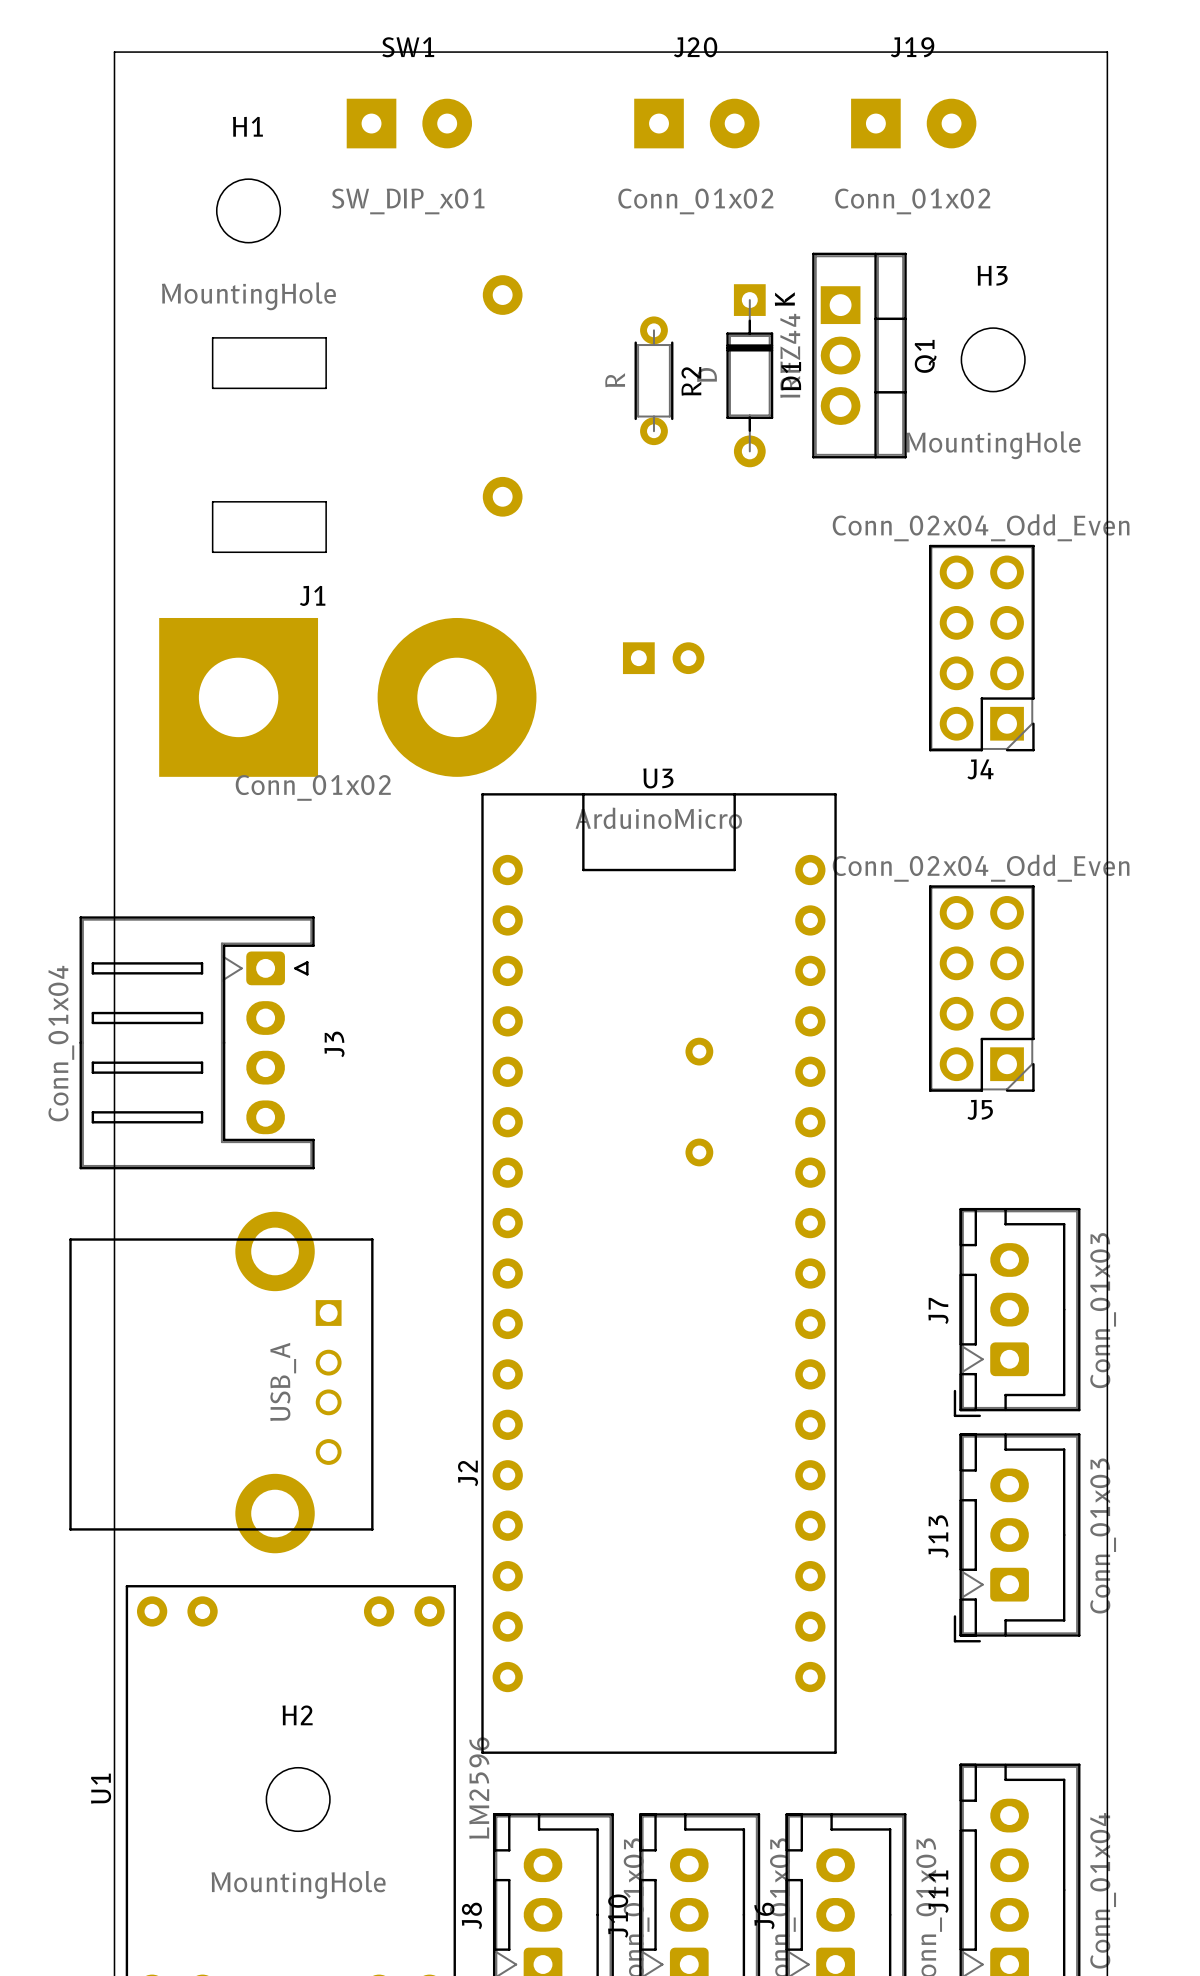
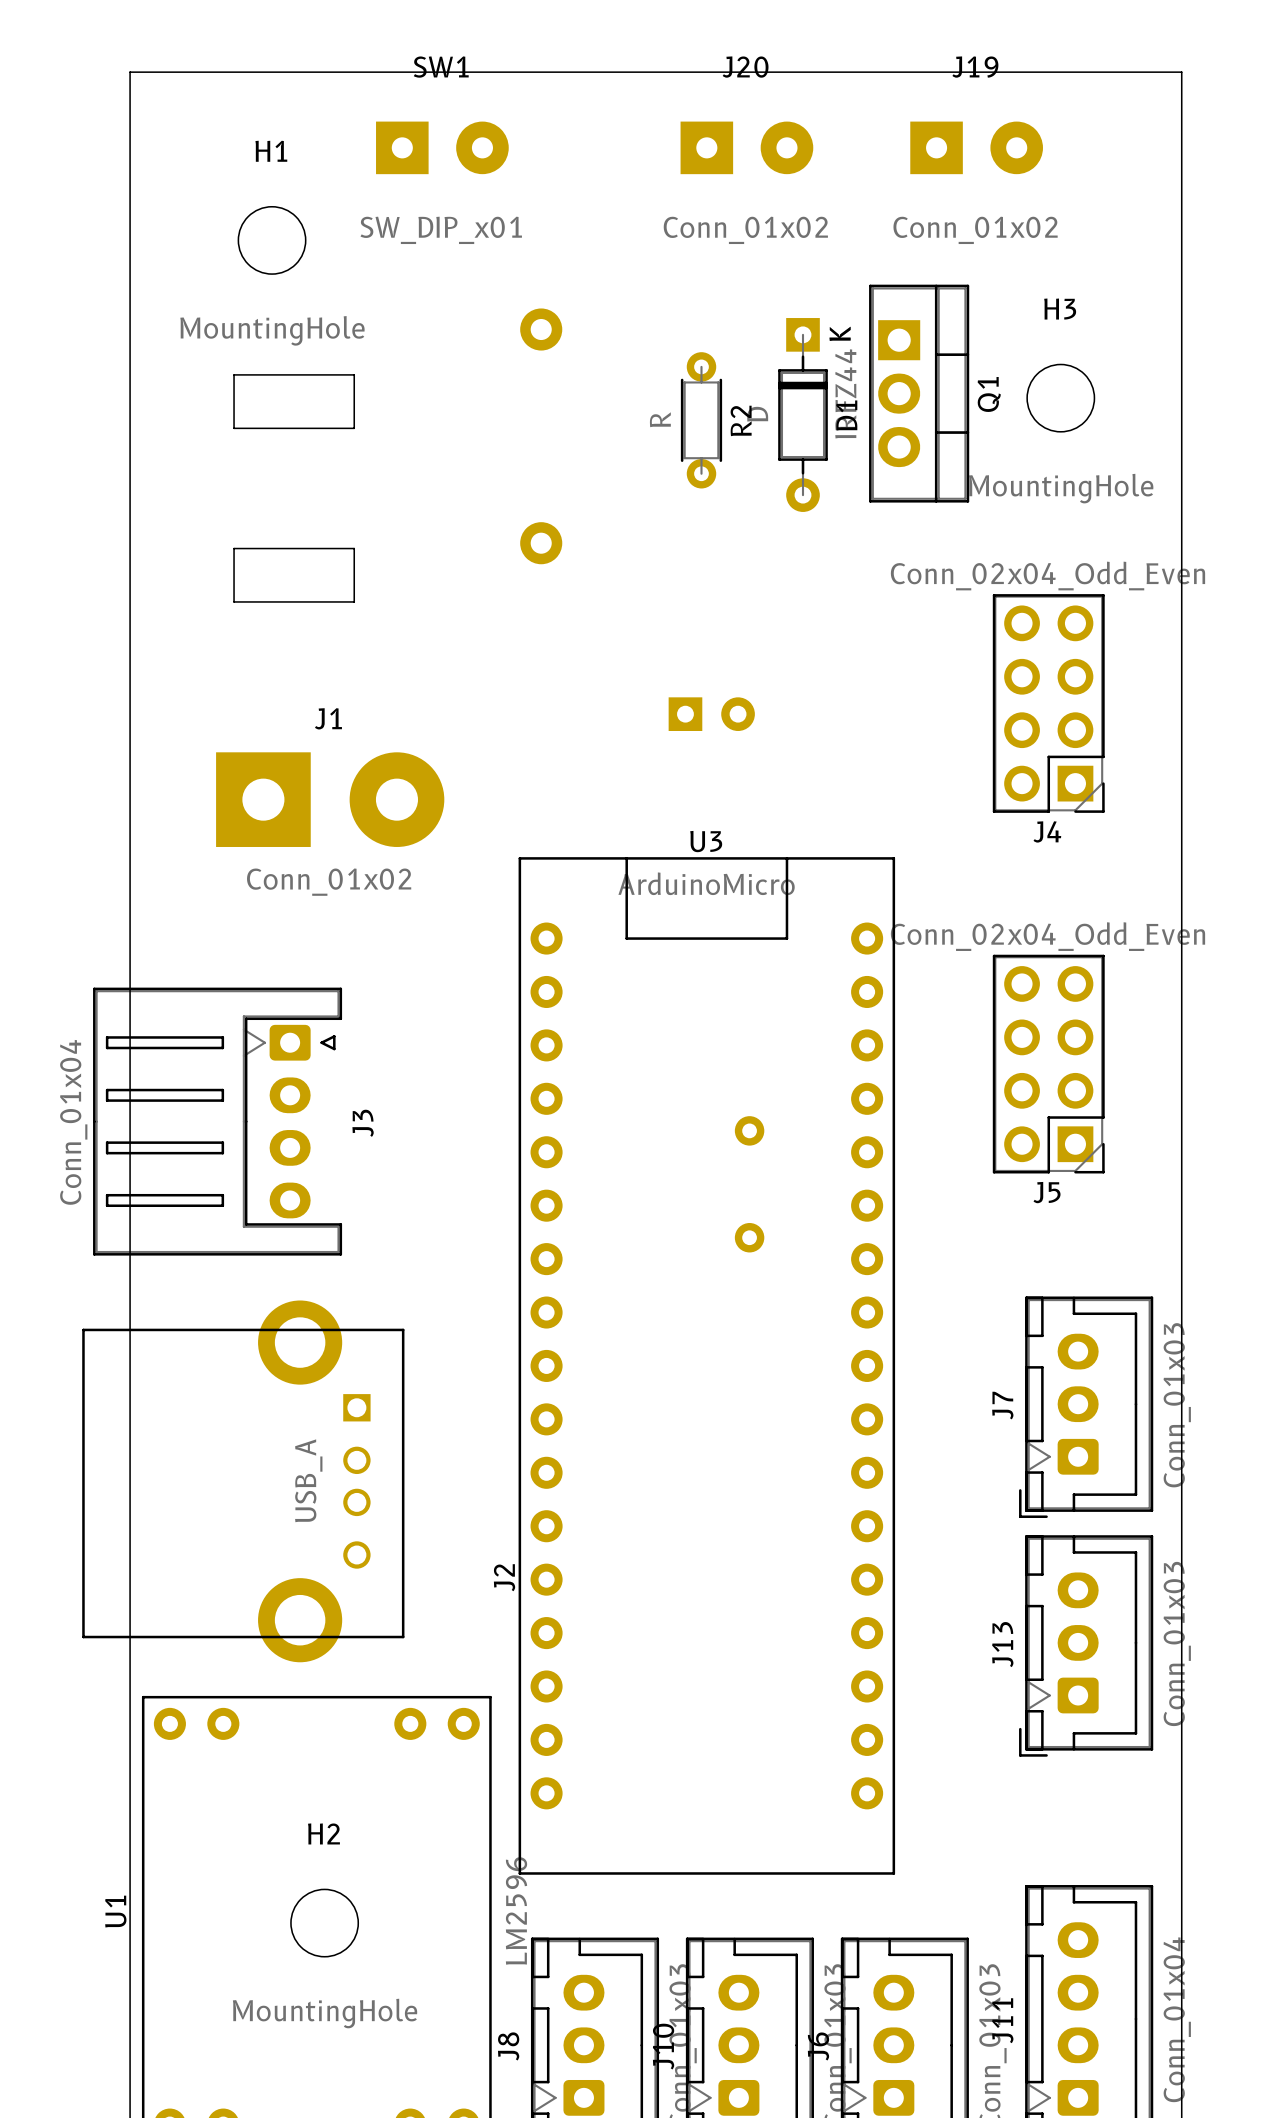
J1 name position: J1 (312, 595) -> J1 (328, 718)
J1 footprint: [159, 617, 537, 777] -> [216, 752, 445, 847]

